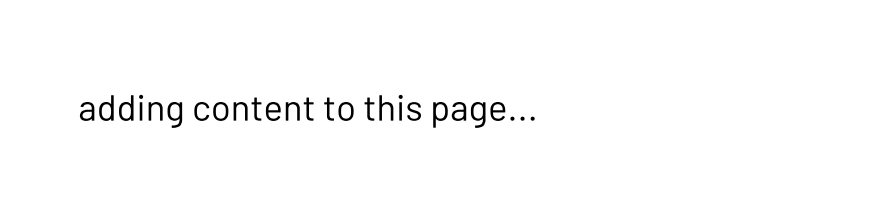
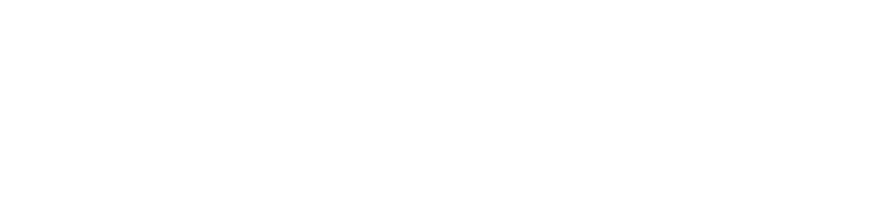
label: adding content to this page... (307, 111) -> none

